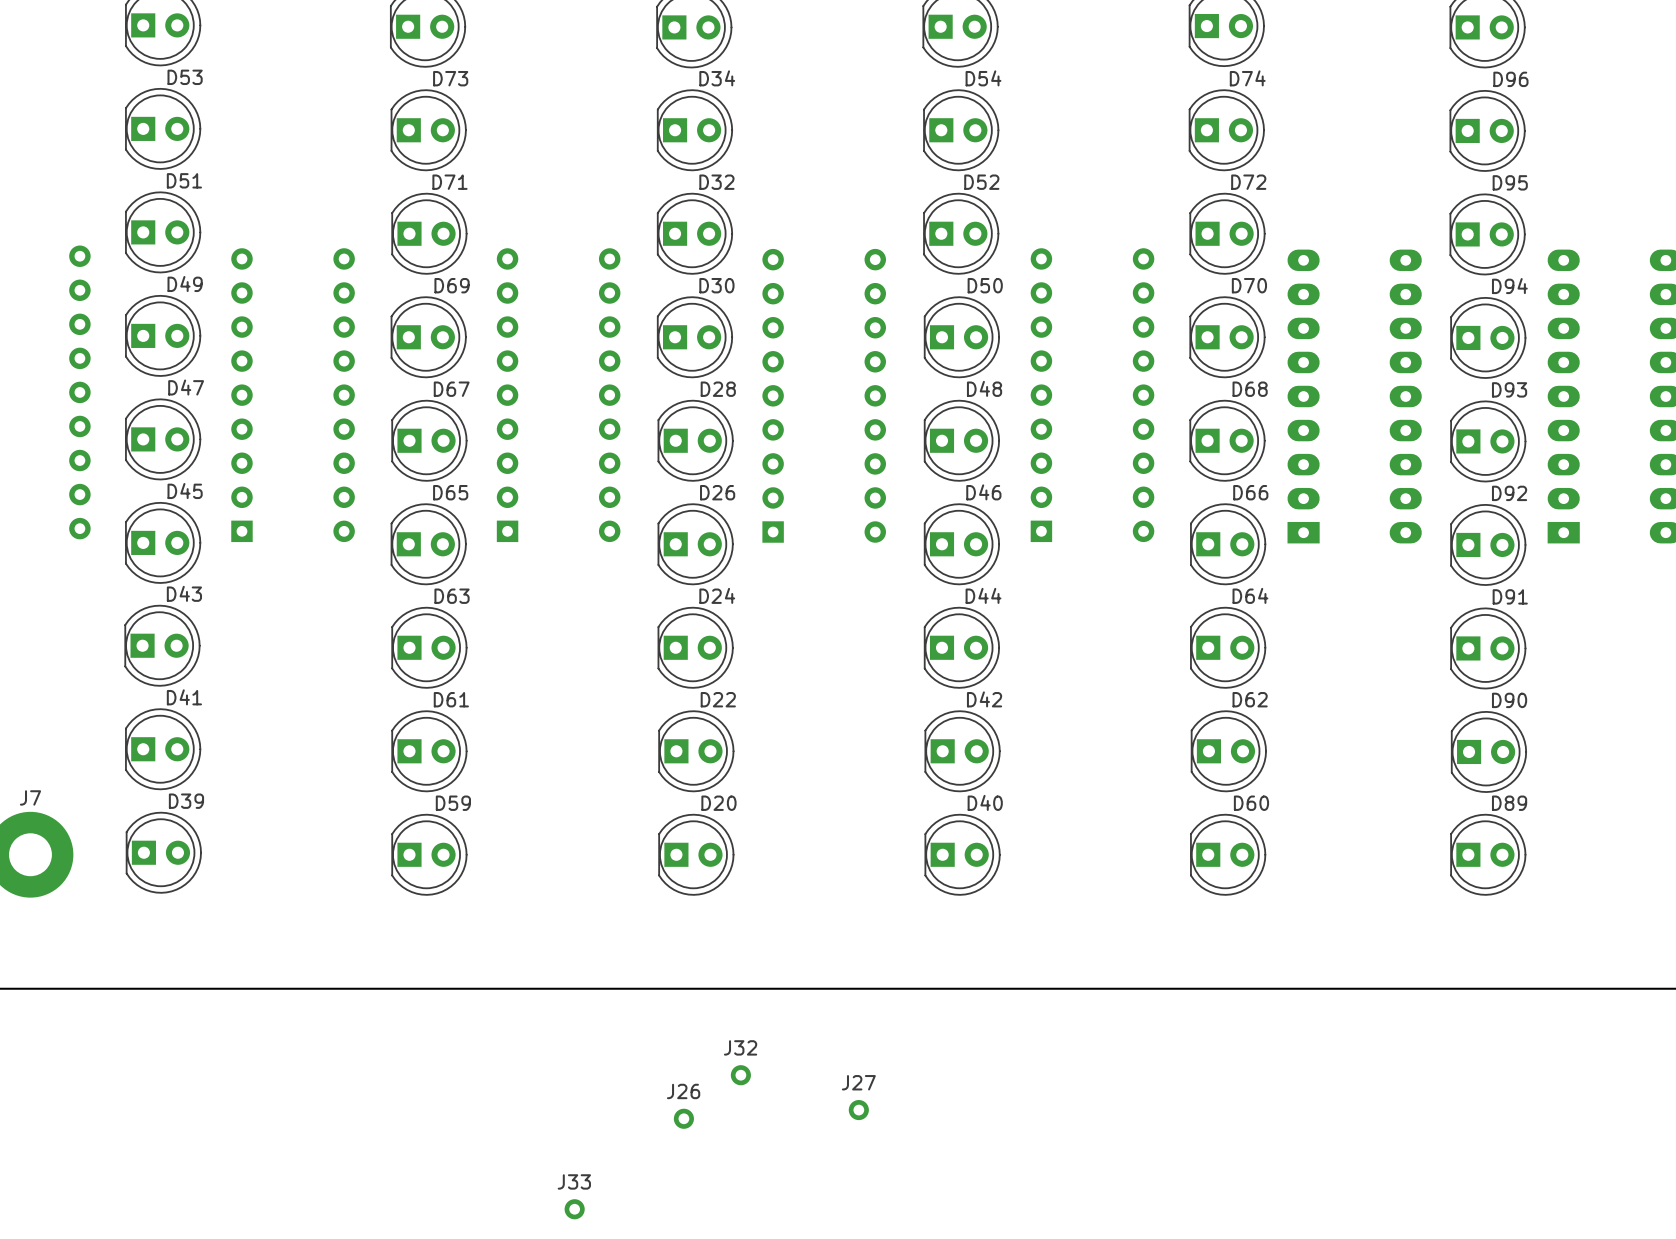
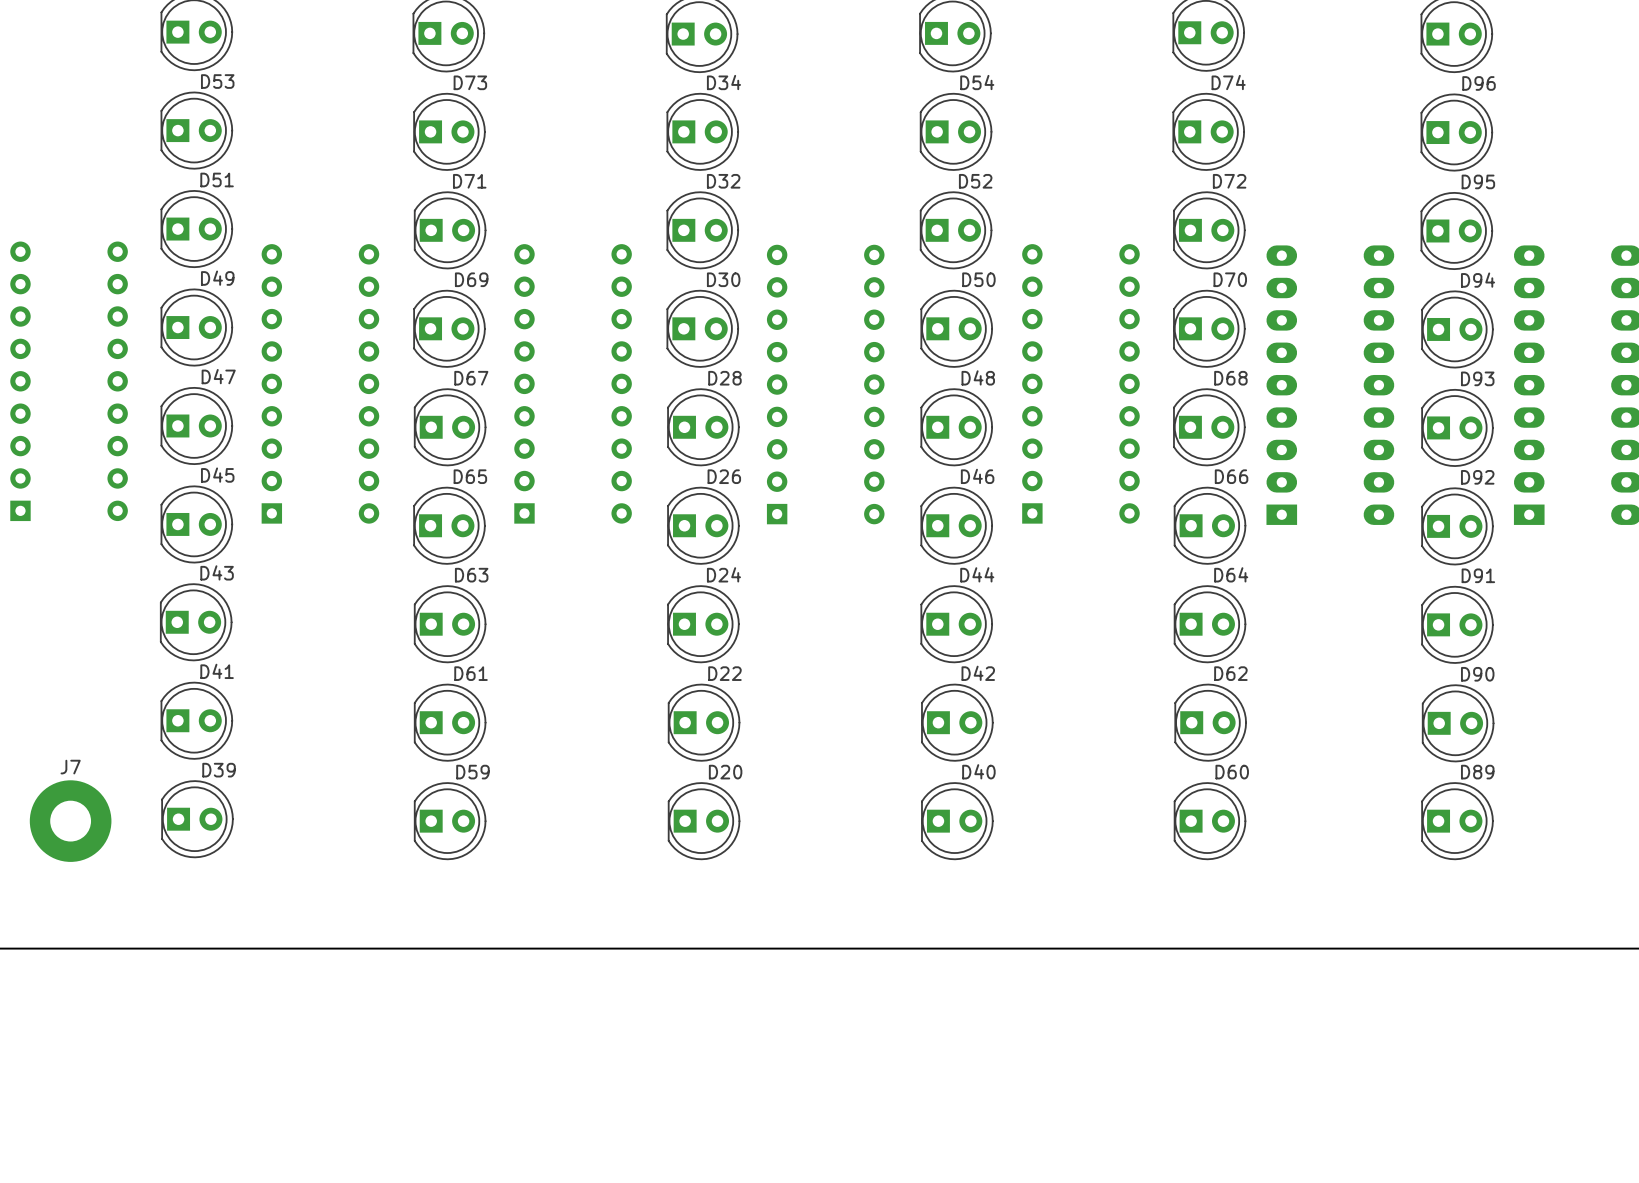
J32: (740, 1075) -> none
J27: (858, 1110) -> none
J26: (683, 1118) -> none
J33: (574, 1209) -> none

